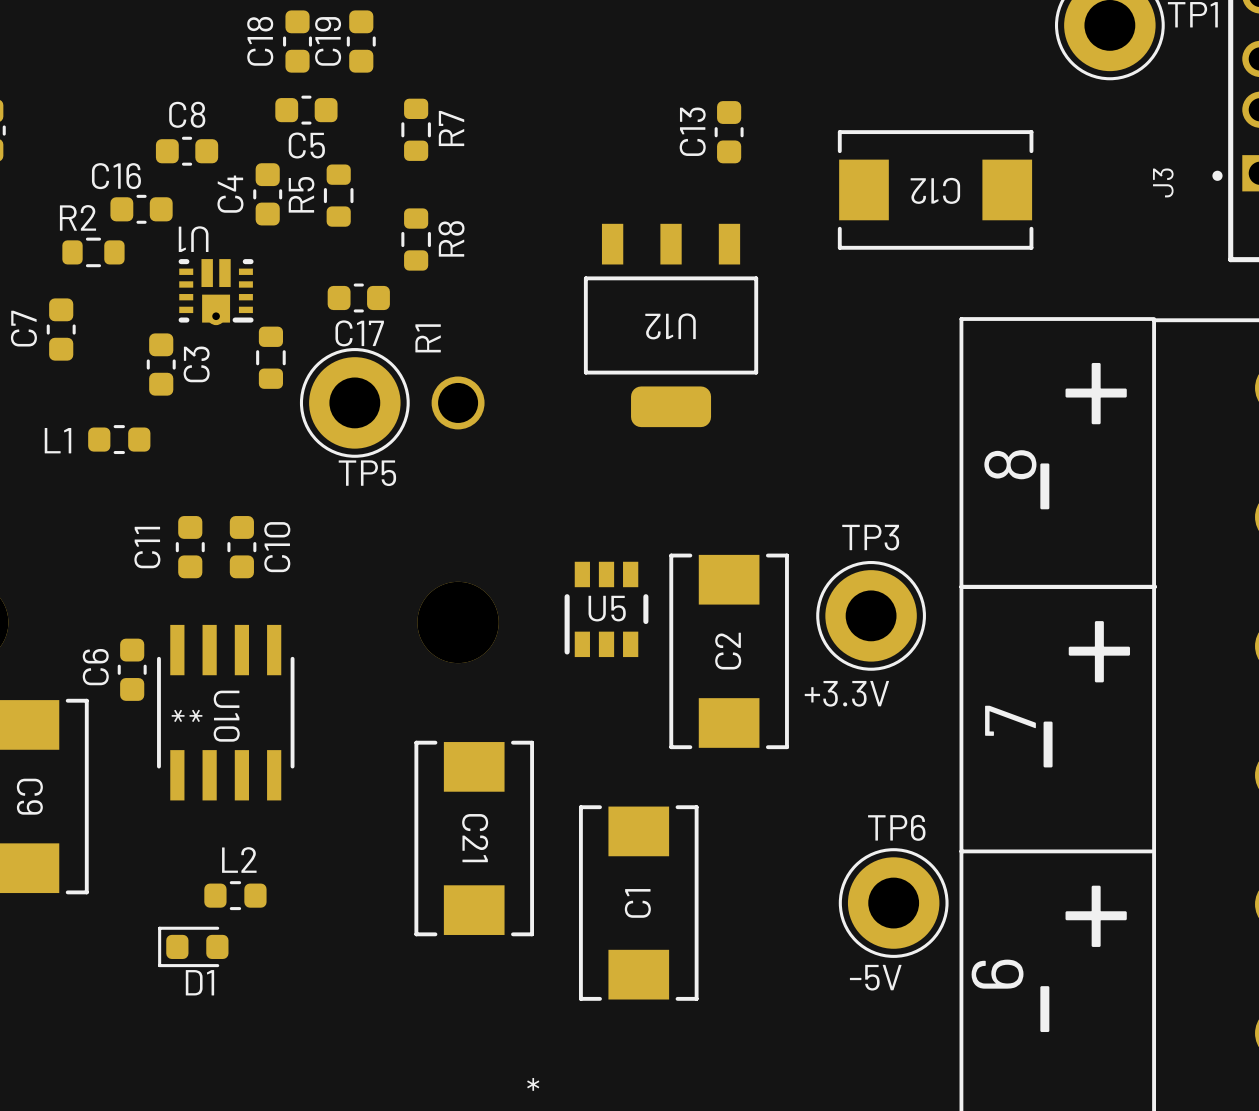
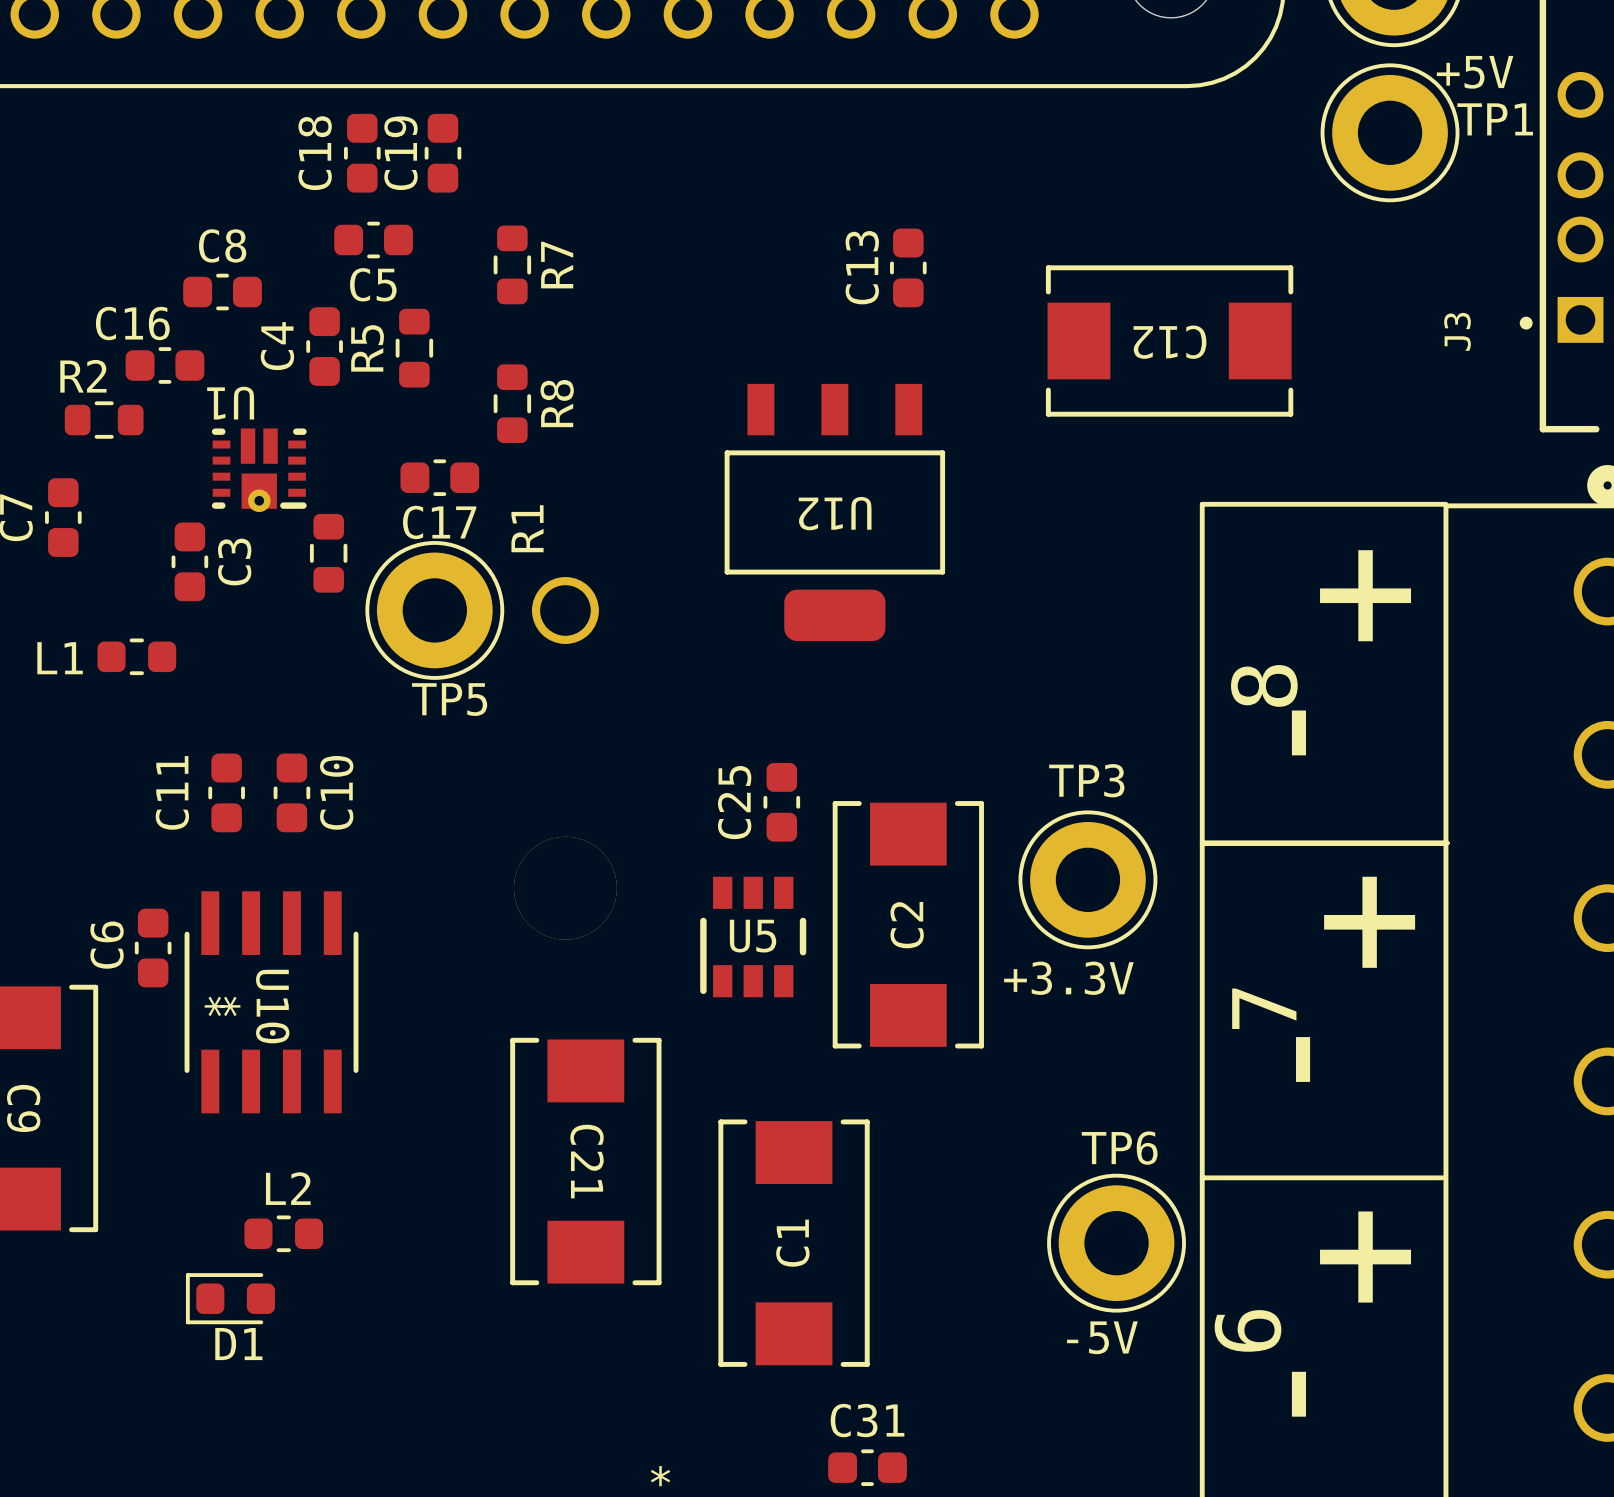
C25: none -> (781, 802)
U5 position: (606, 609) -> (753, 937)
C31: none -> (867, 1467)

